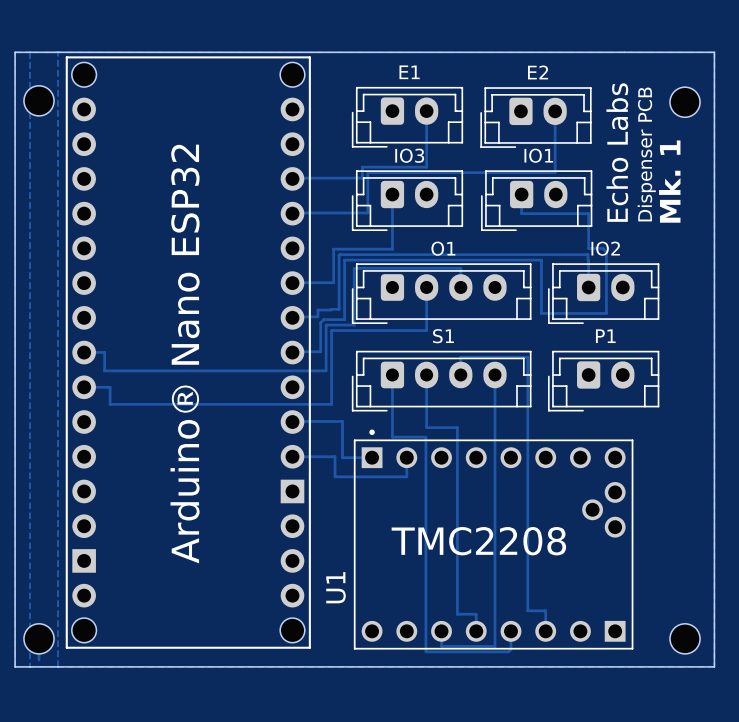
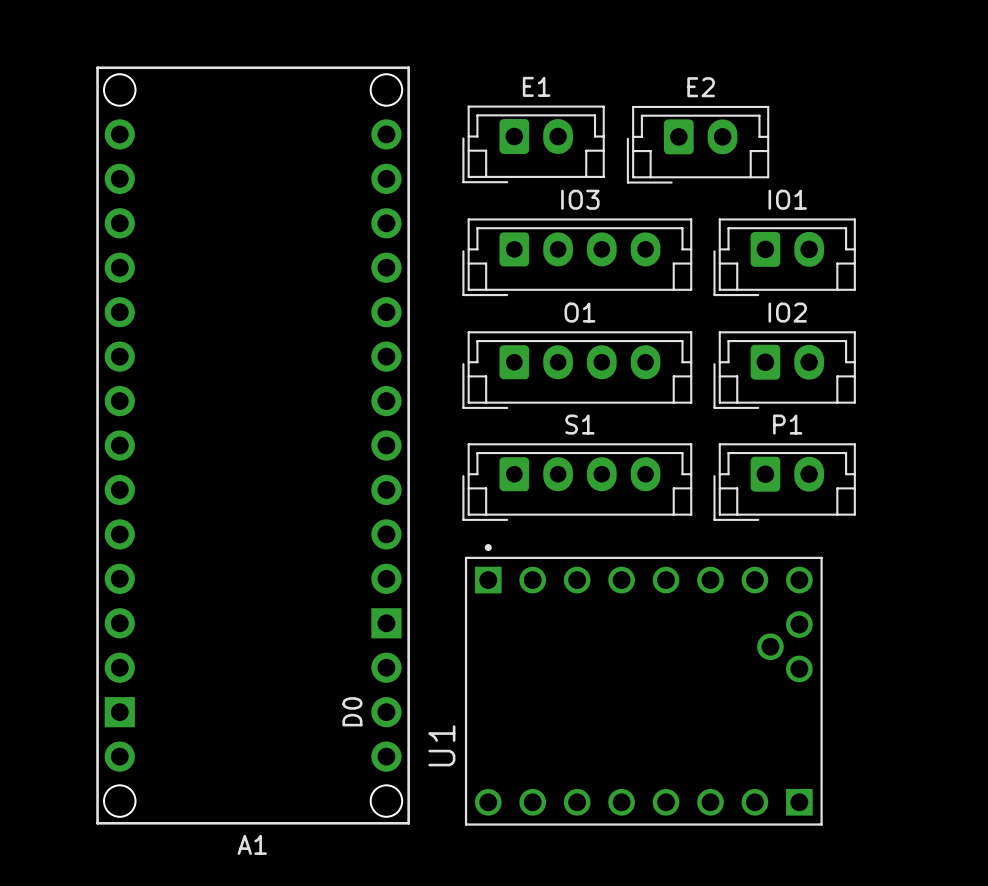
board edge: (15, 52) (714, 52) (714, 666) (15, 666) (15, 52) -> none
zone outline: (30, 52) (30, 666) -> none
zone outline: (58, 52) (58, 666) -> none
part: (39, 100) -> none
part: (685, 102) -> none
track: (426, 111) (426, 167) (362, 167) (362, 178) (292, 178) -> none
track: (555, 111) (555, 172) (367, 172) (367, 212) (292, 213) -> none
text: Echo Labs (617, 152) -> none
text: Dispenser PCB (646, 154) -> none
IO3 footprint: [351, 170, 464, 232] -> [462, 218, 693, 297]
text: Mk. 1 (669, 181) -> none
track: (392, 194) (392, 249) (333, 249) (333, 282) (292, 283) -> none
track: (521, 194) (521, 213) (588, 213) (588, 248) (602, 248) (606, 251) (606, 313) (541, 313) (541, 260) (344, 260) (344, 319) (323, 319) (320, 322) (320, 351) (292, 352) -> none
IO1 position: (536, 200) -> (784, 257)
track: (426, 287) (426, 330) (331, 330) (331, 404) (110, 404) (110, 387) (84, 387) -> none
track: (460, 287) (460, 268) (354, 268) (354, 325) (326, 325) (326, 370) (104, 370) (104, 352) (84, 352) -> none
track: (588, 287) (587, 254) (339, 254) (339, 309) (317, 310) (317, 316) (292, 317) -> none
text: Arduino® Nano ESP32 (185, 354) -> none
track: (392, 374) (392, 437) (425, 437) (425, 651) (508, 651) (510, 649) (510, 631) -> none
track: (426, 374) (426, 427) (457, 427) (457, 614) (475, 614) (476, 631) -> none
track: (460, 374) (460, 357) (527, 357) (527, 610) (545, 610) -> none
track: (494, 374) (494, 646) (441, 646) (441, 631) -> none
track: (292, 422) (342, 421) (342, 457) (372, 457) -> none
track: (292, 456) (334, 456) (335, 476) (406, 476) (406, 457) -> none
text: TMC2208 (478, 541) -> none
A1 text: none -> D0 (352, 711)
track: (545, 610) (545, 631) -> none
part: (39, 638) -> none
part: (685, 638) -> none
track: (39, 647) (39, 660) -> none
A1 name: none -> A1 (252, 844)

